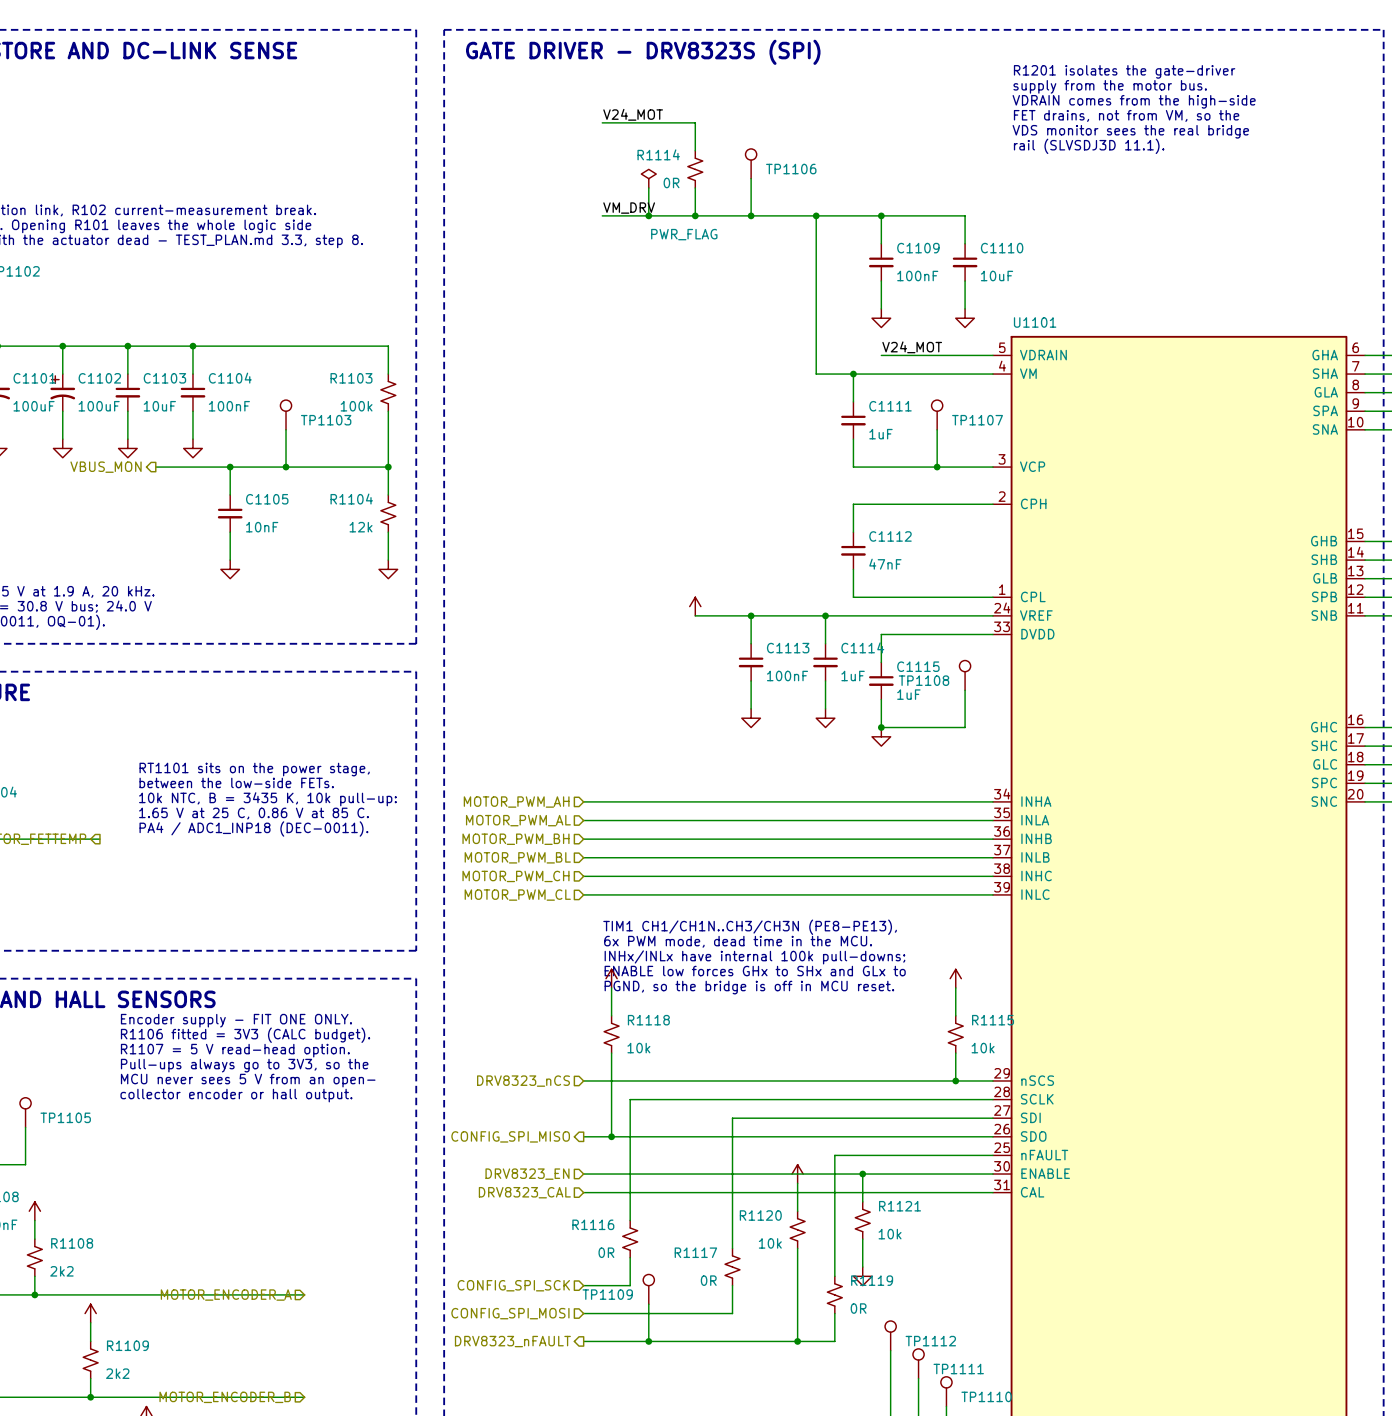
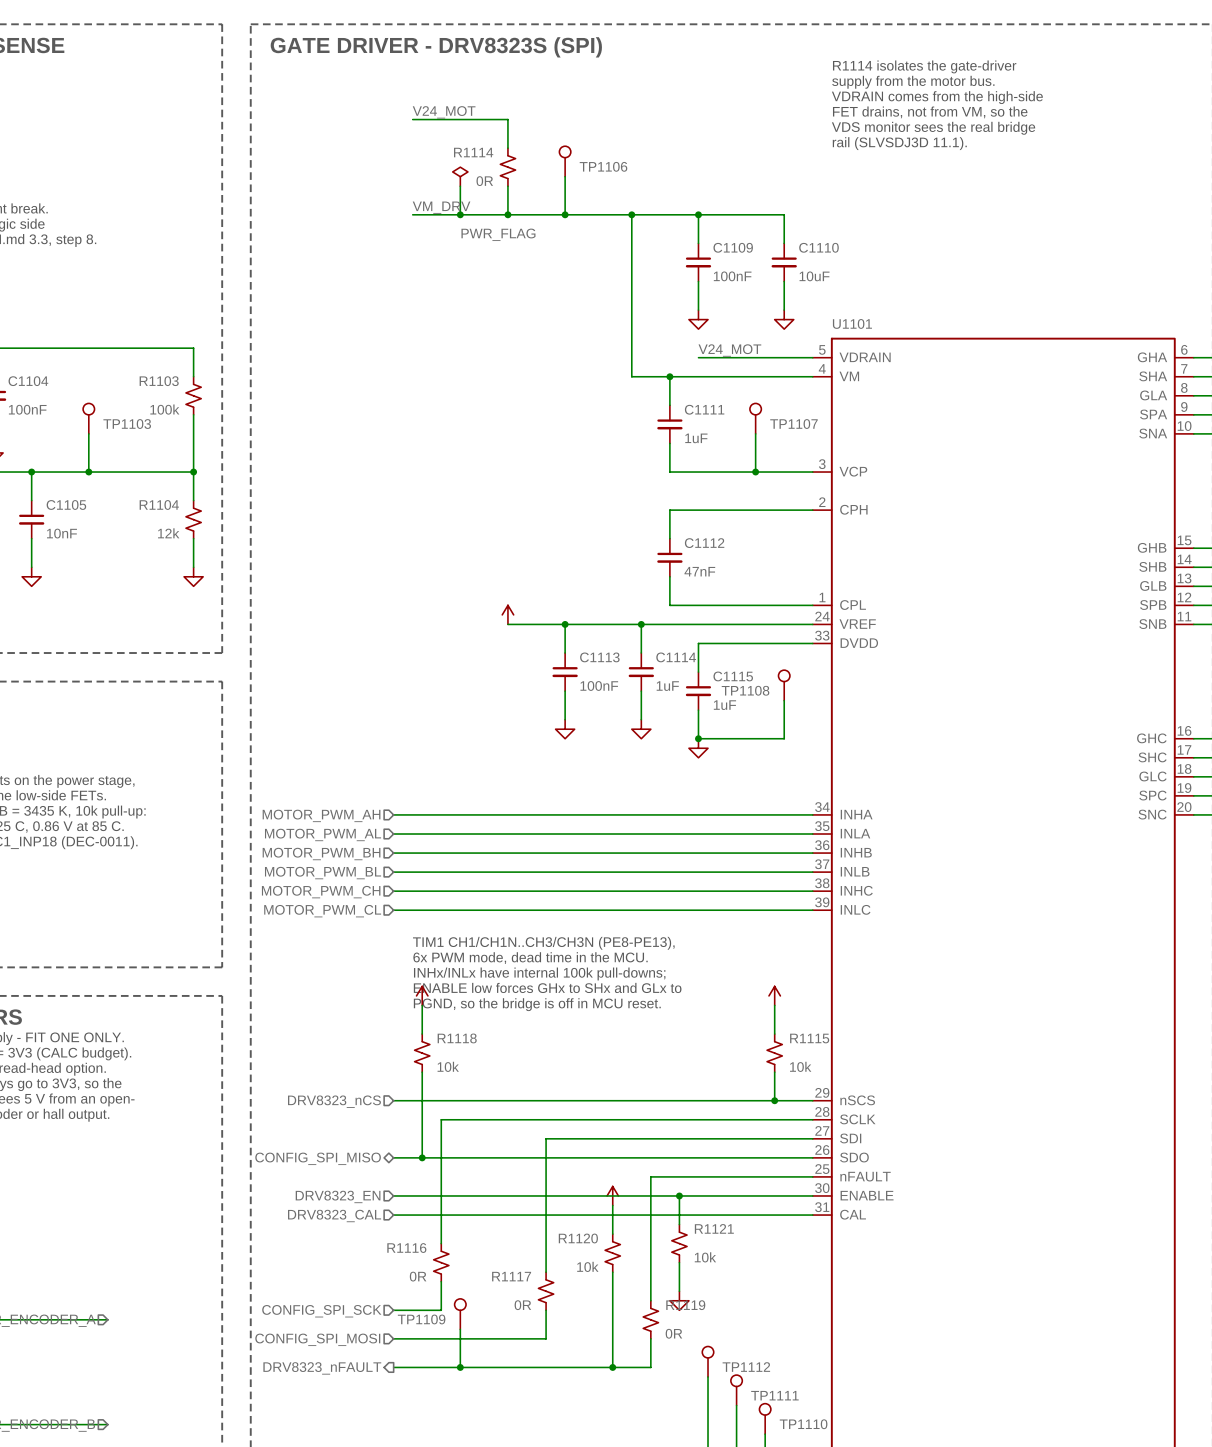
text: R1201 isolates the gate-driver (1124, 71) -> R1114 isolates the gate-driver (924, 66)
hierarchical label shape: output (510, 1136) -> bidirectional (318, 1158)

